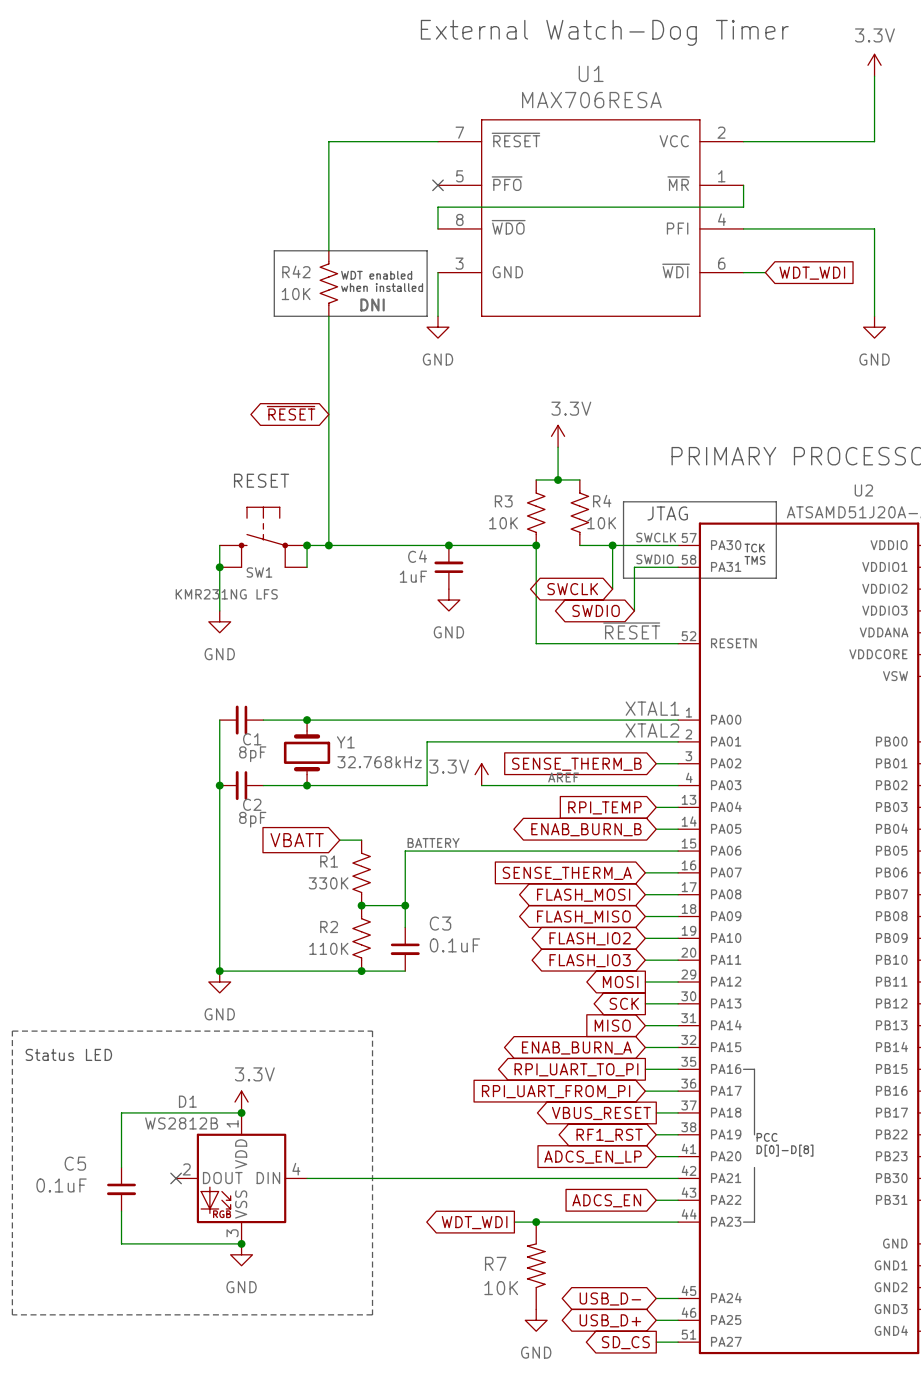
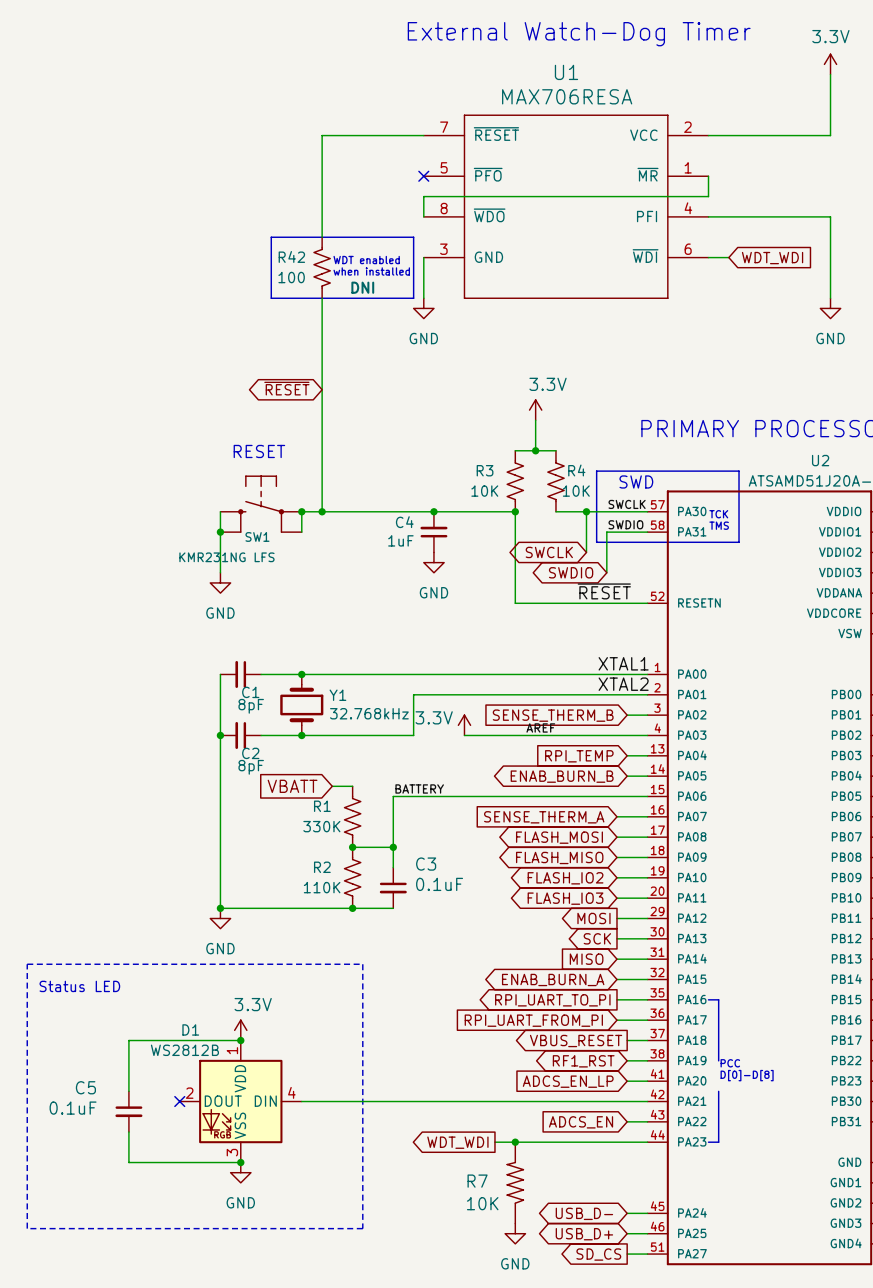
R42 value: 10K (296, 294) -> 100 (291, 277)
text: JTAG (667, 513) -> SWD (636, 481)

